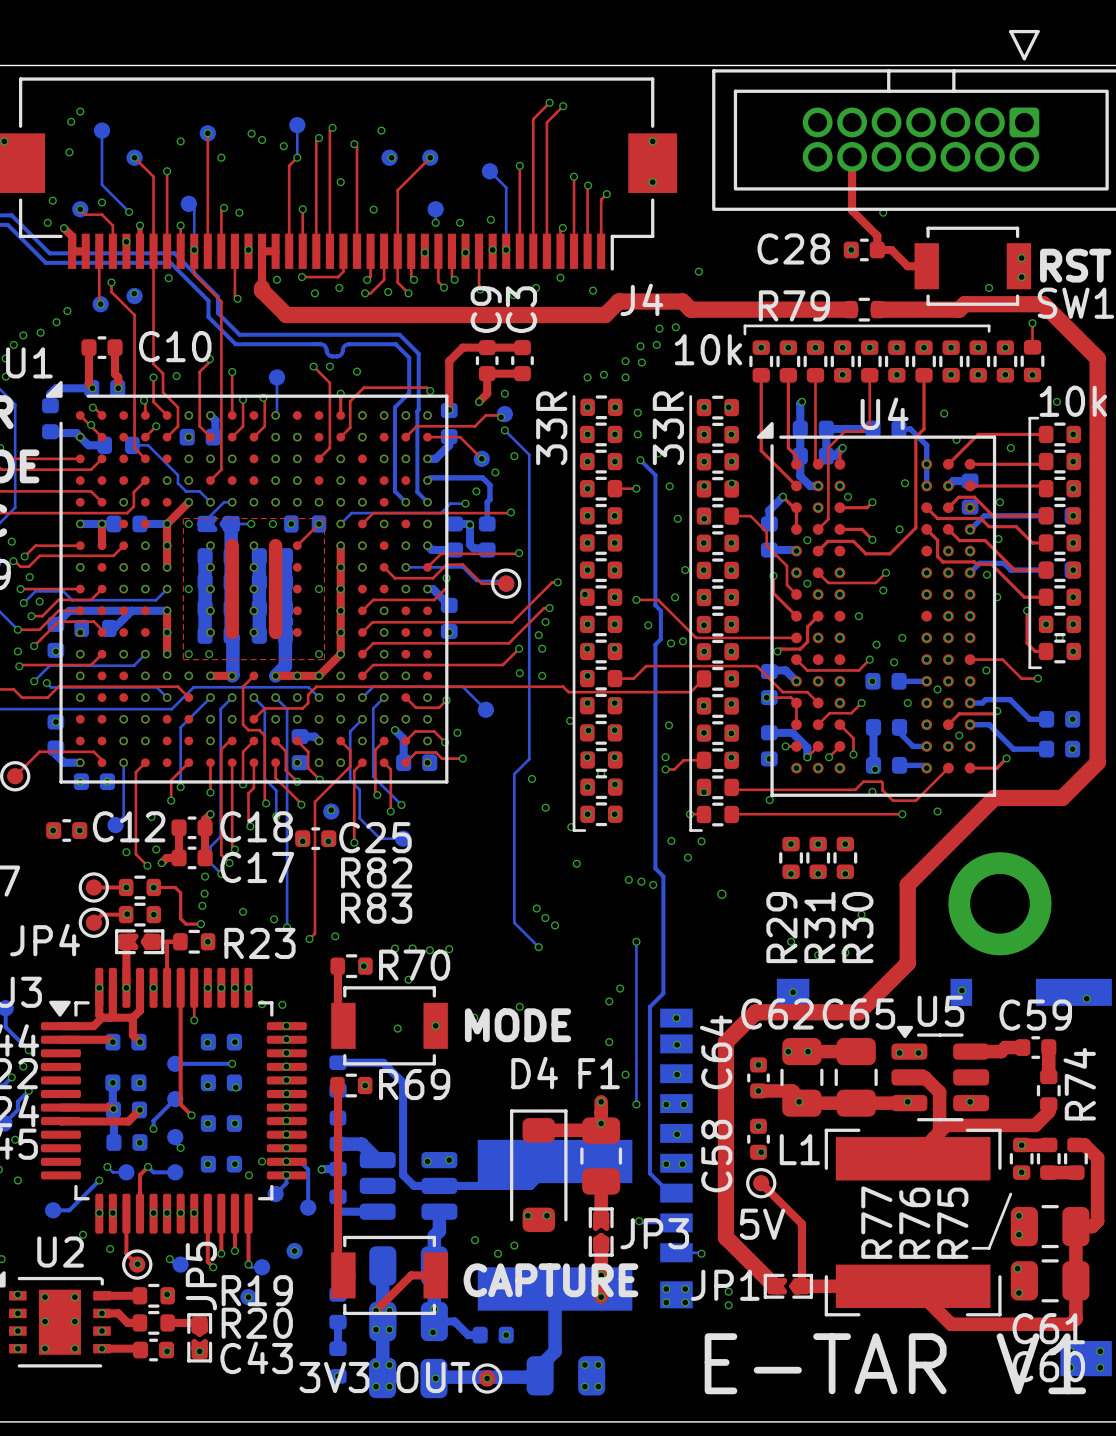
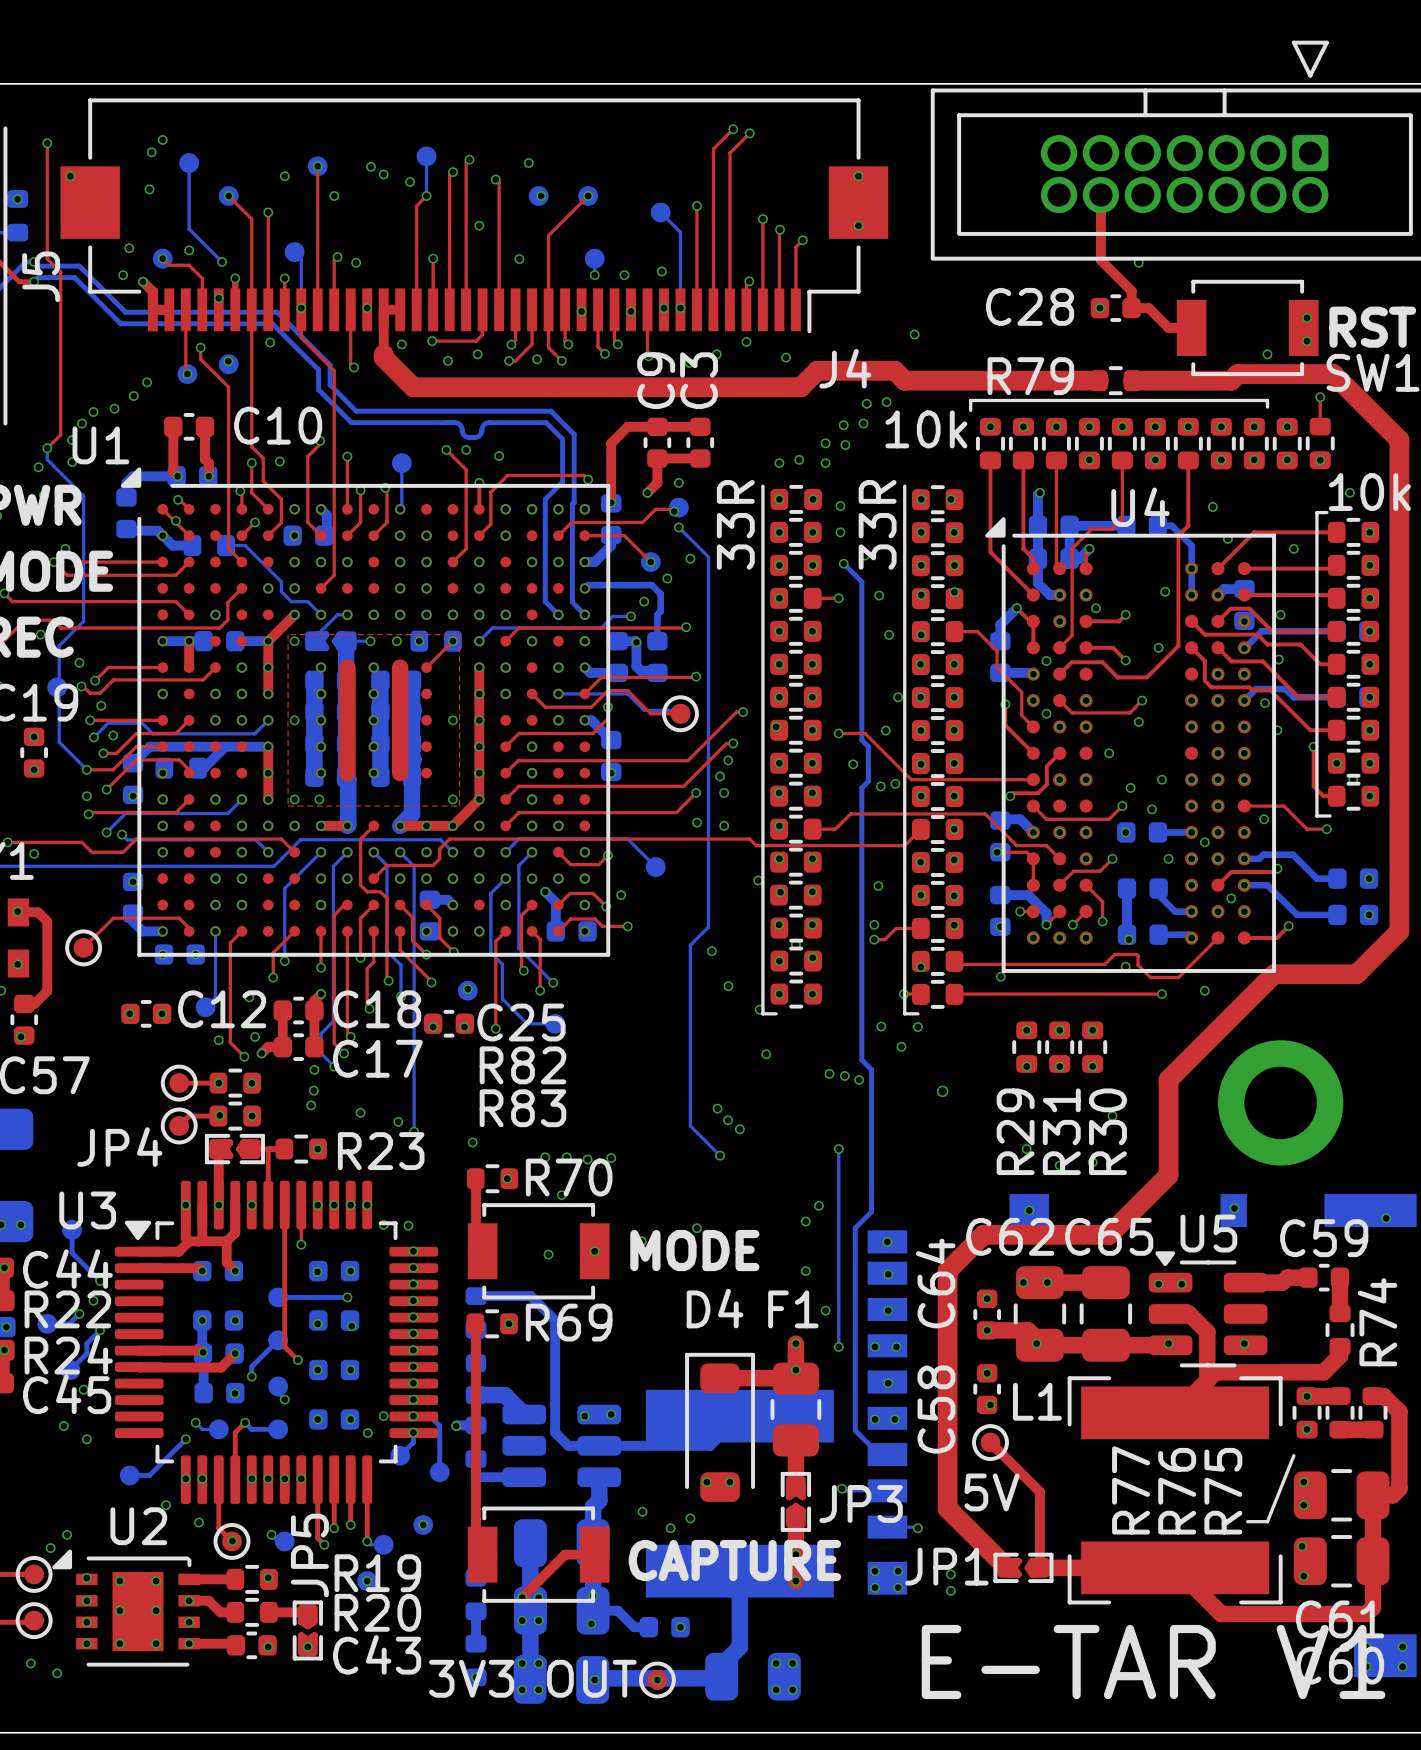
top track: (340, 740) (350, 750) (350, 766) (314, 801) (314, 933) (309, 939) -> none
top track: (153, 887) (175, 887) (180, 892) (180, 918) (186, 924) (201, 924) -> none
via: (201, 924) -> none
via: (309, 939) -> none

